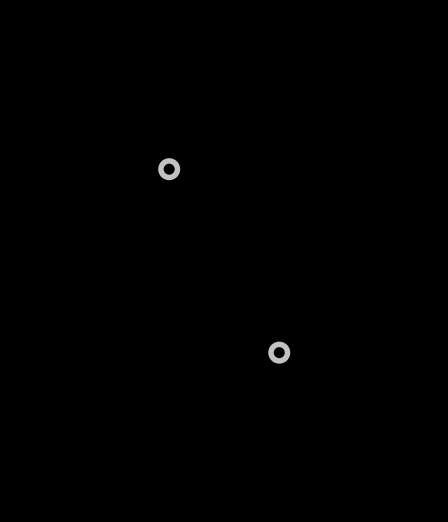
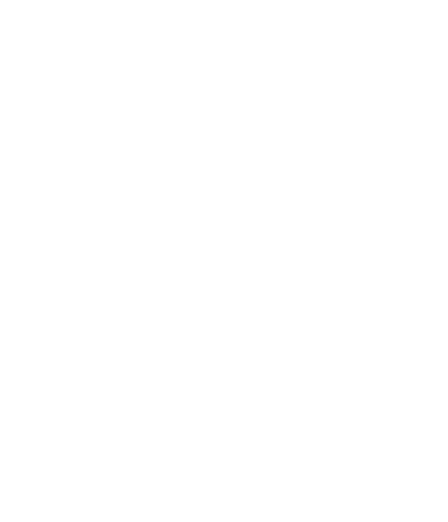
via: (169, 169) -> none
via: (279, 352) -> none

